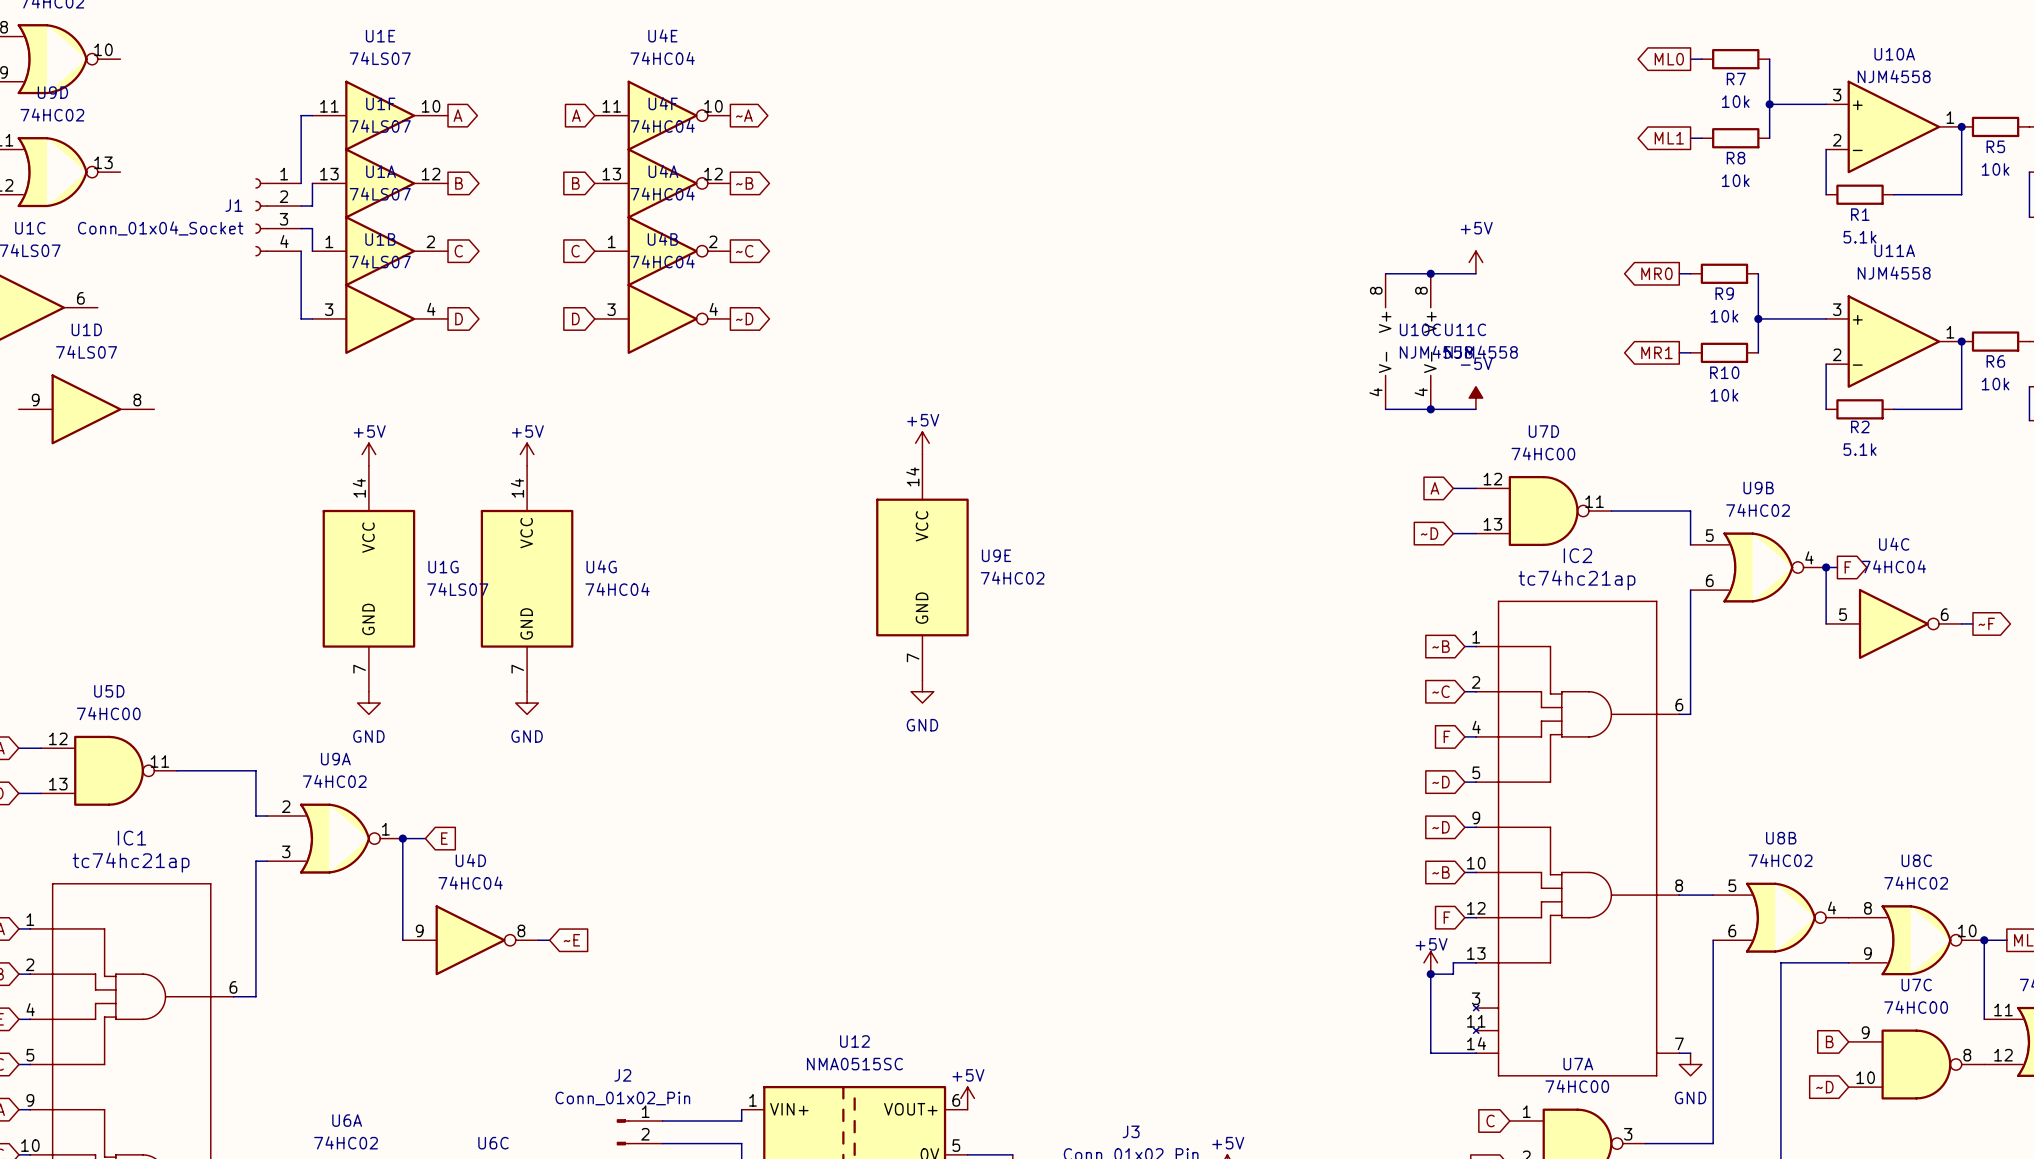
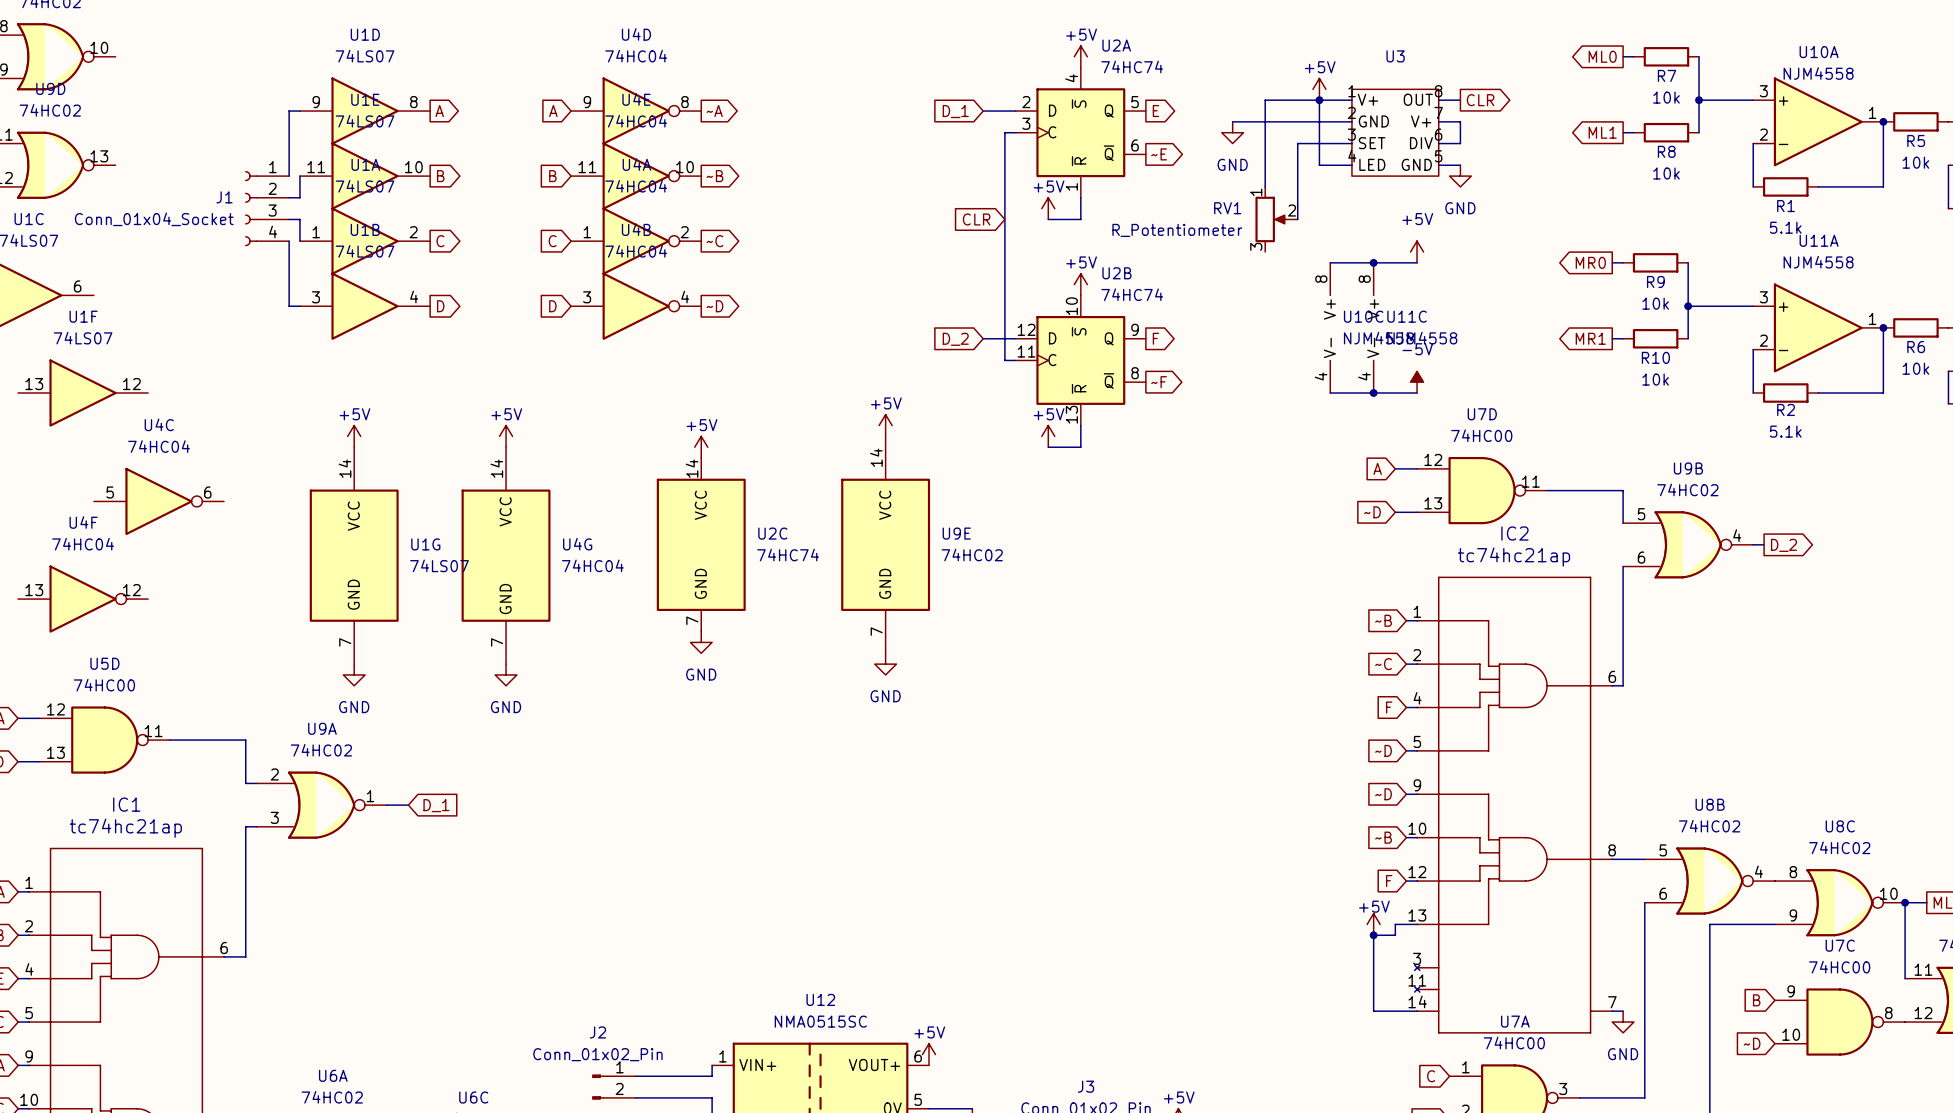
power symbol: none -> +5V (1080, 56)
power symbol: none -> +5V (1319, 89)
wire: none -> (1319, 100) (1319, 165) (1351, 165)
junction: none -> (1319, 100)
wire: none -> (1351, 100) (1265, 100) (1265, 186)
wire: none -> (1438, 100) (1460, 100)
global label: none -> CLR (1480, 100)
U1E position: (380, 115) -> (365, 176)
U4E position: (662, 115) -> (636, 176)
wire: none -> (983, 111) (1015, 111)
global label: none -> E (1155, 111)
global label: none -> D_1 (955, 111)
wire: none -> (1232, 121) (1351, 121)
wire: none -> (1438, 121) (1460, 121) (1460, 143) (1438, 143)
wire: none -> (1015, 132) (1004, 132) (1004, 360) (1015, 360)
U2A: none -> 74HC74 (1080, 132)
power symbol: none -> GND (1232, 132)
U3: none -> (1395, 132)
wire: none -> (1351, 143) (1297, 143) (1297, 219)
global label: none -> ~E (1159, 154)
wire: none -> (1438, 165) (1460, 165)
U1F position: (380, 183) -> (83, 393)
U4F position: (662, 183) -> (83, 599)
power symbol: none -> GND (1460, 176)
wire: none -> (1080, 197) (1080, 219) (1048, 219)
power symbol: none -> +5V (1048, 208)
global label: none -> CLR (976, 219)
RV1: none -> R_Potentiometer (1276, 219)
power symbol: none -> +5V (1080, 284)
wire: none -> (983, 338) (1015, 338)
global label: none -> F (1155, 338)
global label: none -> D_2 (955, 339)
U2B: none -> 74HC74 (1080, 360)
global label: none -> ~F (1159, 382)
U1D position: (86, 409) -> (365, 111)
wire: none -> (1080, 425) (1080, 447) (1048, 447)
power symbol: none -> +5V (1048, 436)
power symbol: none -> +5V (701, 447)
U2C: none -> 74HC74 (701, 544)
wire: (1826, 567) (1826, 623) -> none
junction: (1826, 567) -> none
global label: F (1847, 567) -> D_2 (1783, 545)
U4C position: (1893, 623) -> (158, 501)
wire: (1961, 623) (1972, 623) -> none
global label: ~F (1986, 623) -> none
power symbol: none -> GND (701, 642)
wire: (402, 838) (402, 940) -> none
junction: (402, 838) -> none
global label: E (444, 838) -> D_1 (436, 805)
U4D position: (470, 940) -> (636, 111)
wire: (538, 940) (549, 940) -> none
global label: ~E (571, 940) -> none

